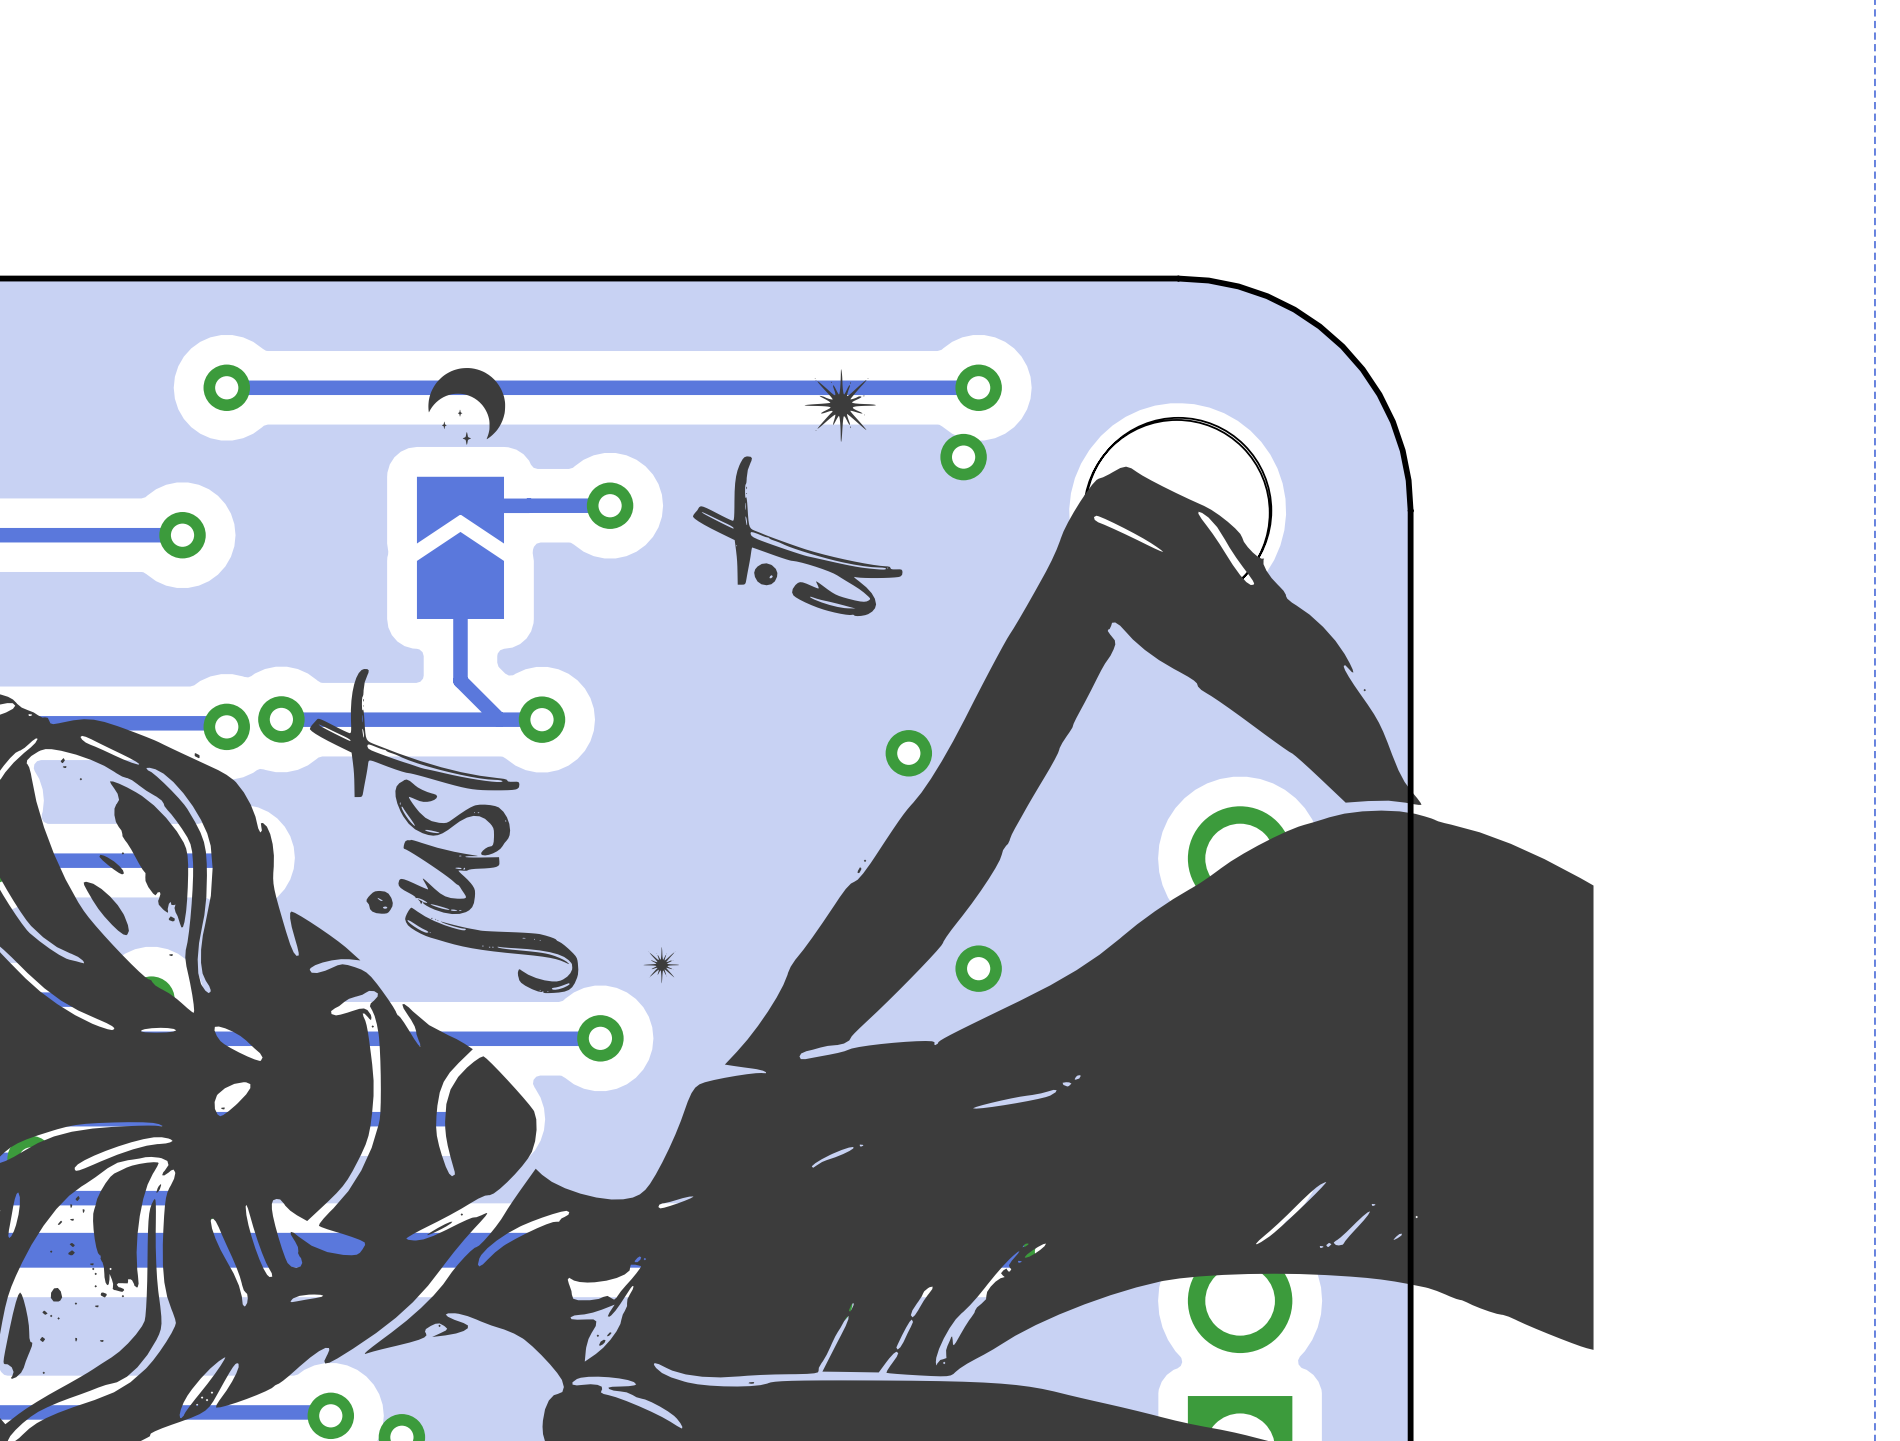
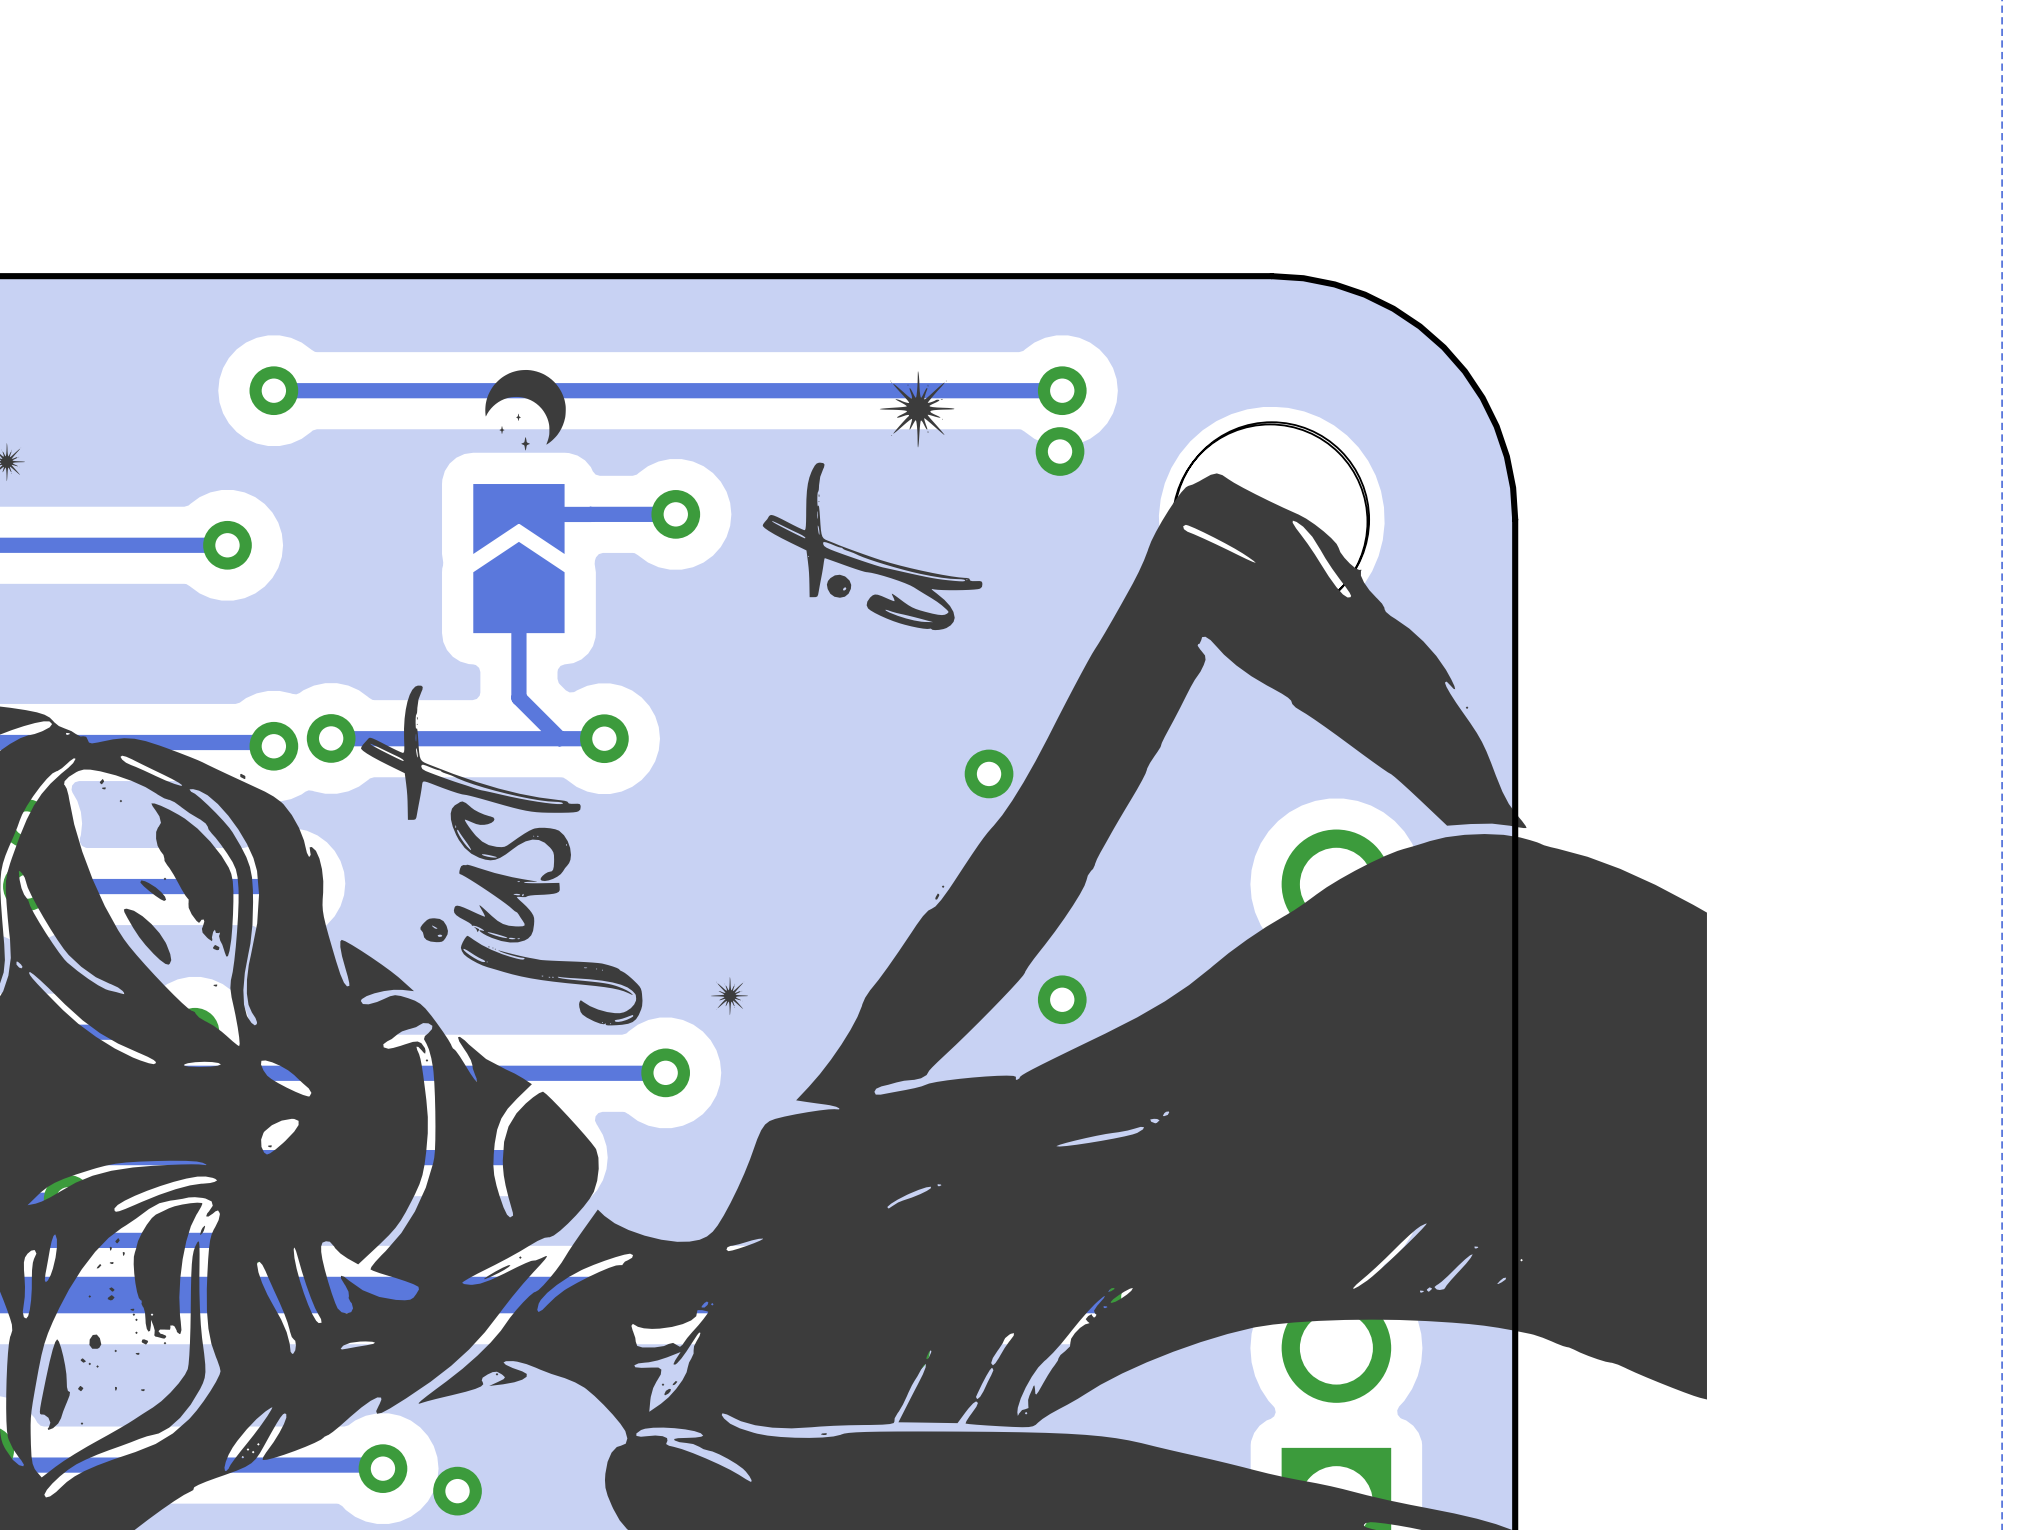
via position: (963, 457) -> (1060, 451)

